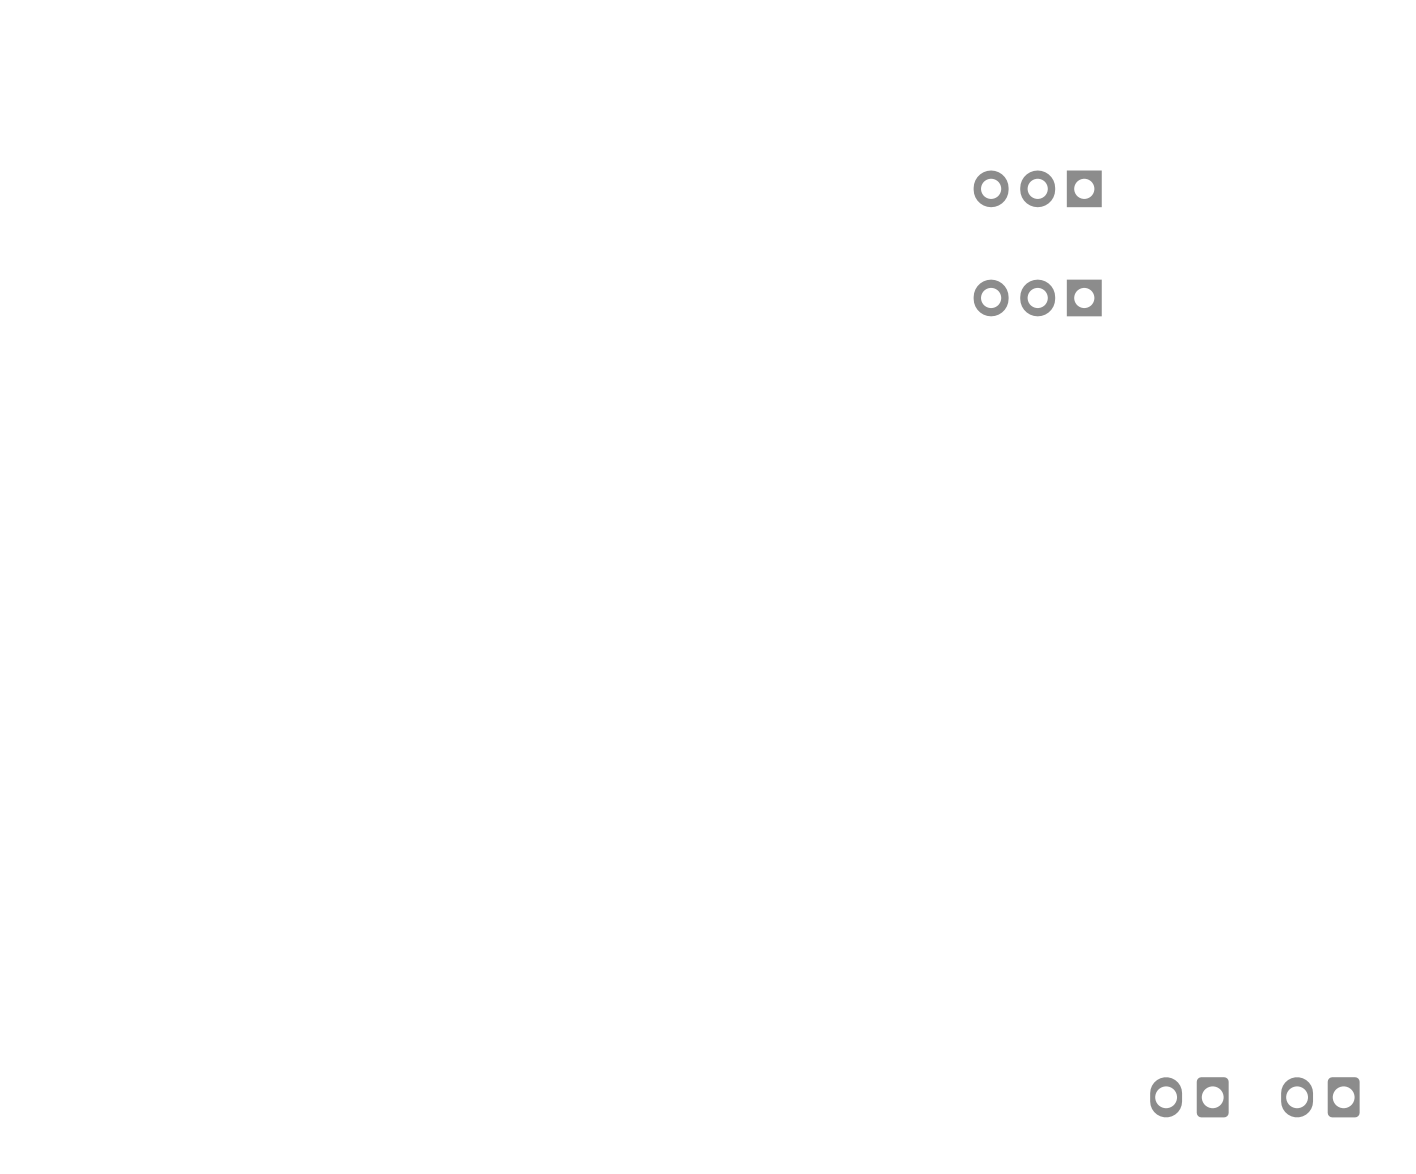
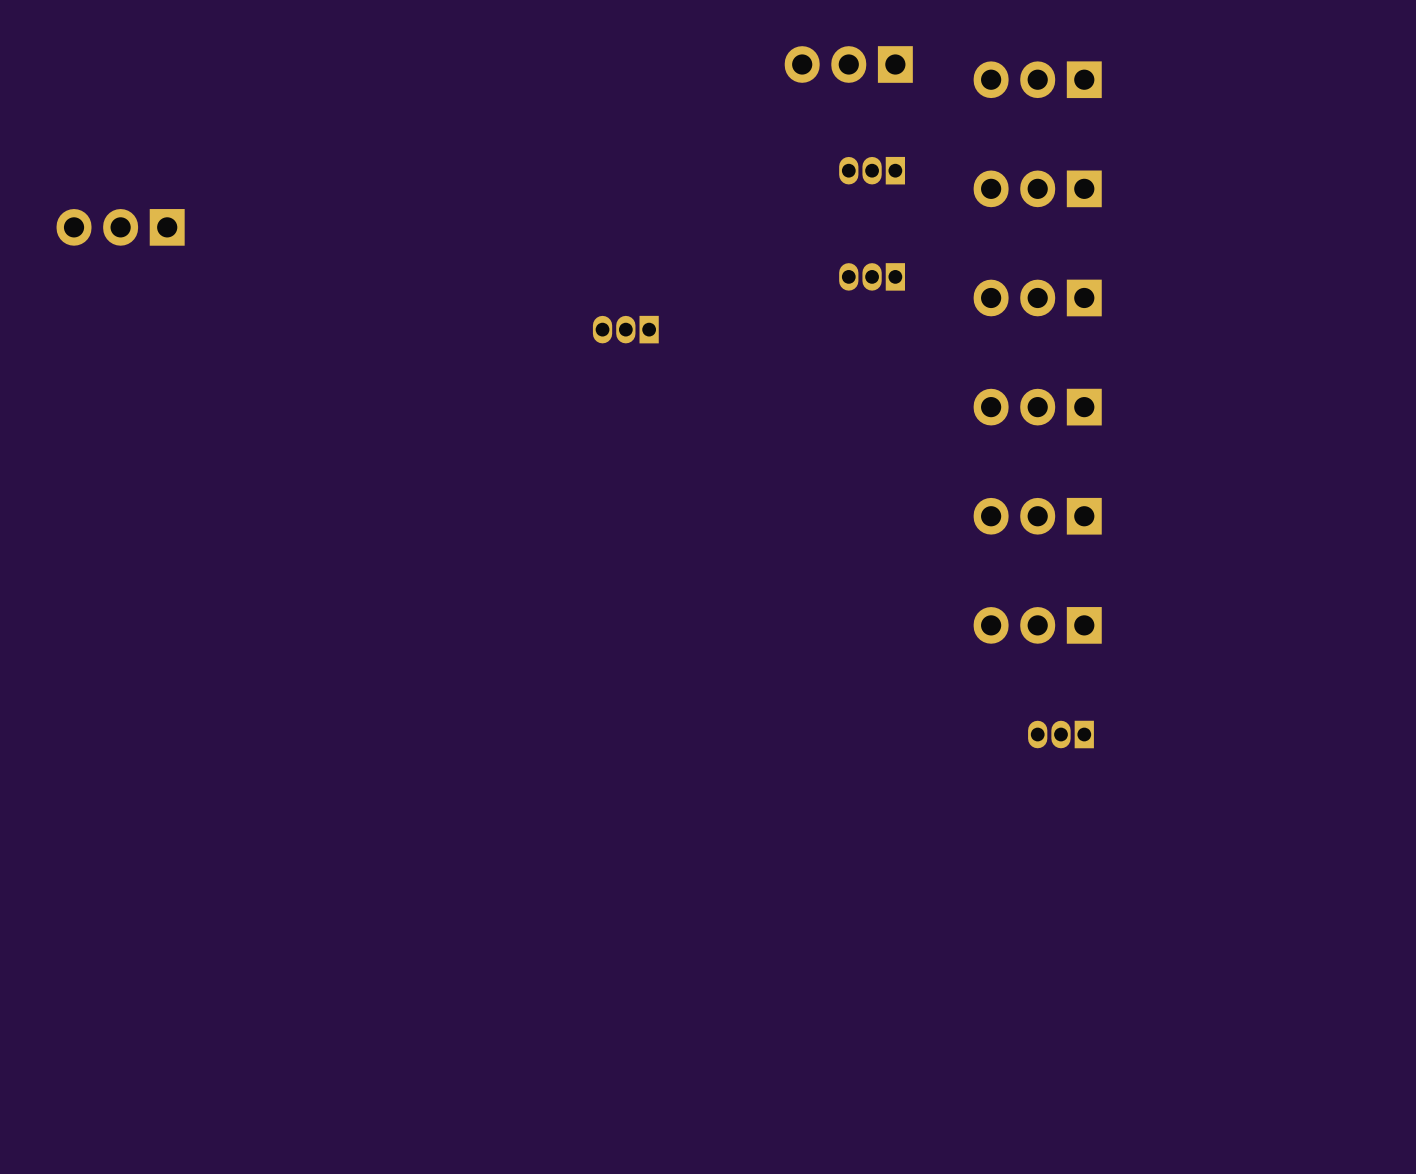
part: none -> (848, 64)
part: none -> (1037, 79)
part: none -> (872, 170)
part: none -> (120, 227)
part: none -> (872, 276)
part: none -> (625, 329)
part: none -> (1037, 407)
part: none -> (1037, 516)
part: none -> (1037, 625)
part: none -> (1060, 734)
part: (1189, 1097) -> none
part: (1320, 1097) -> none

